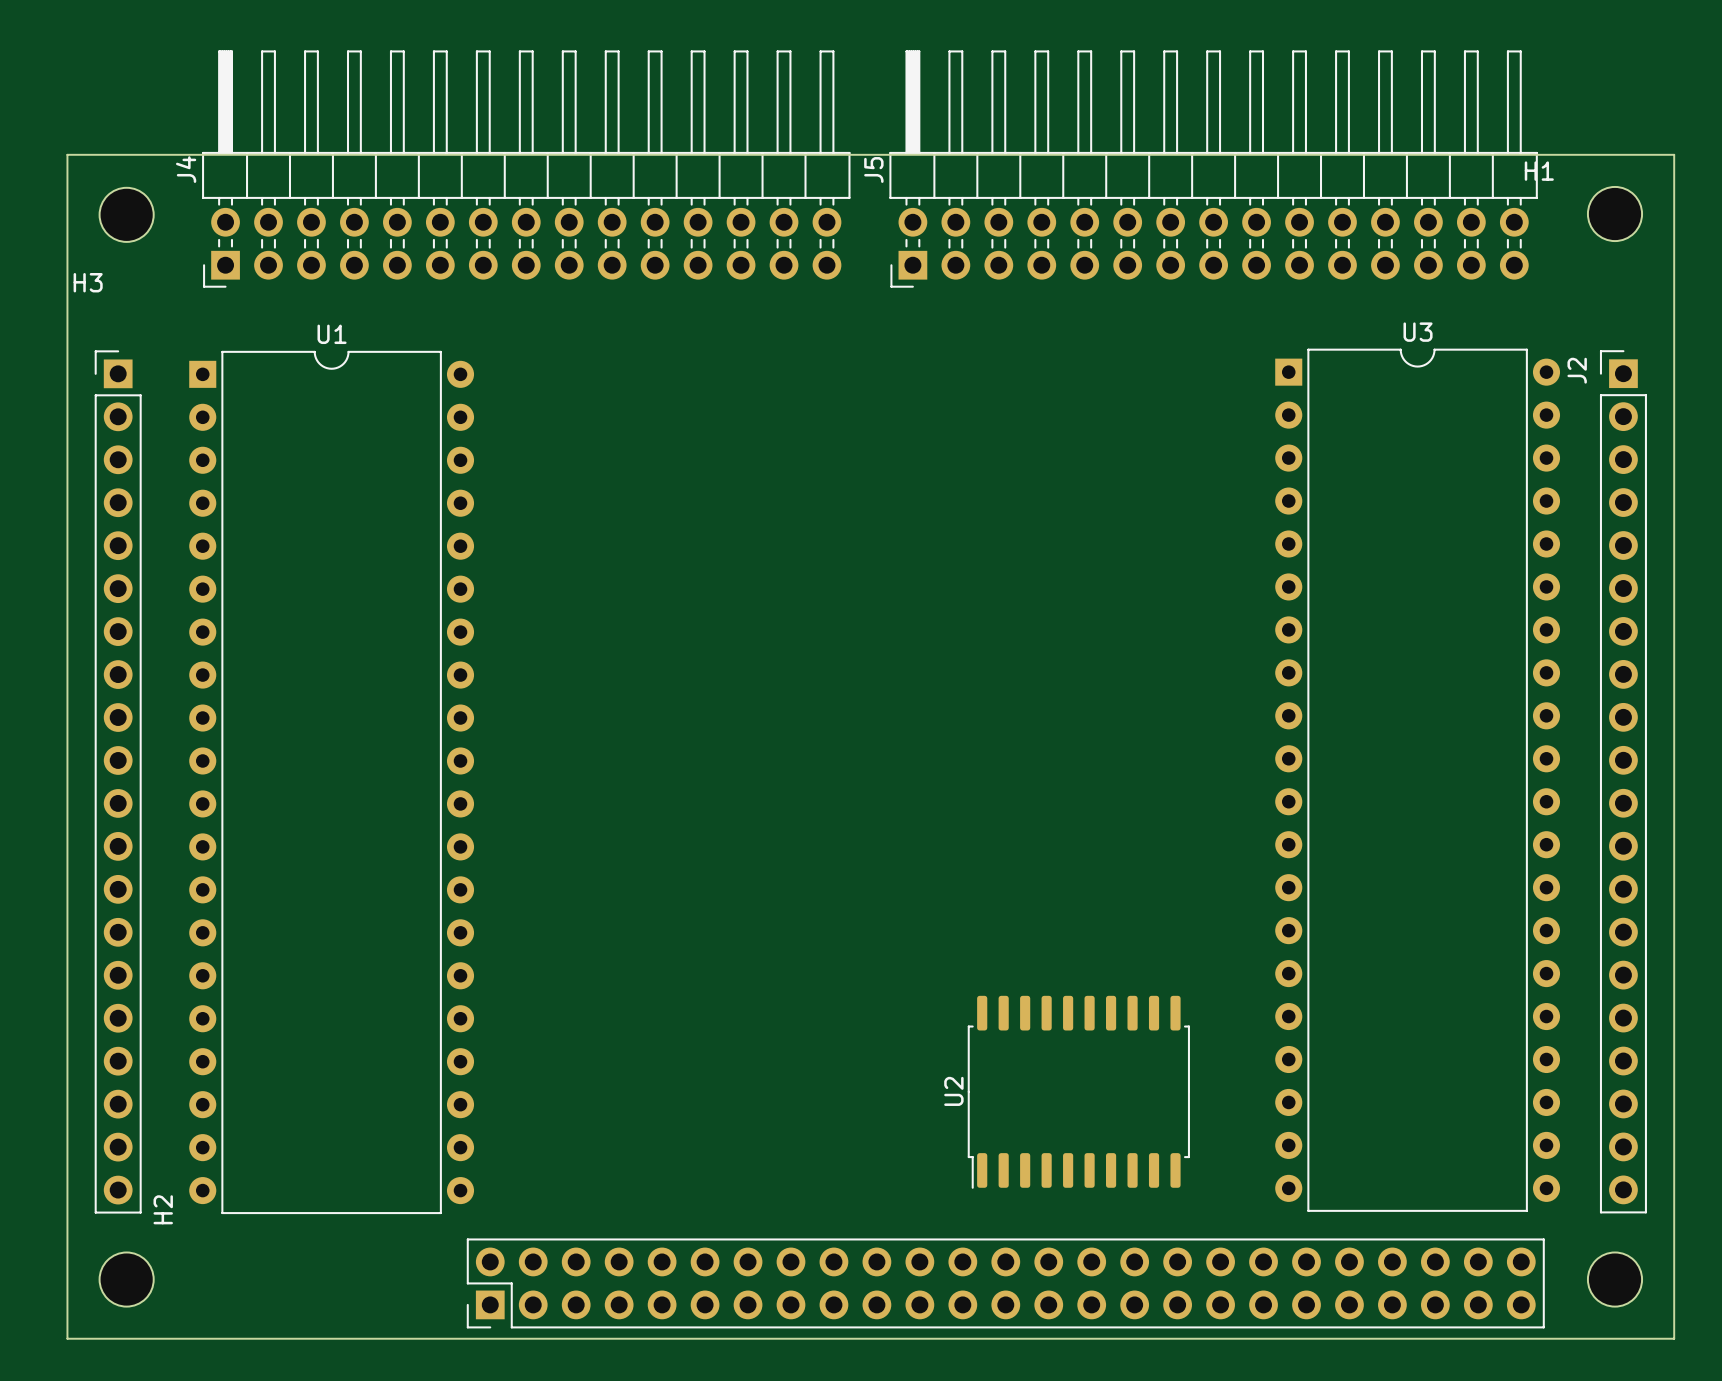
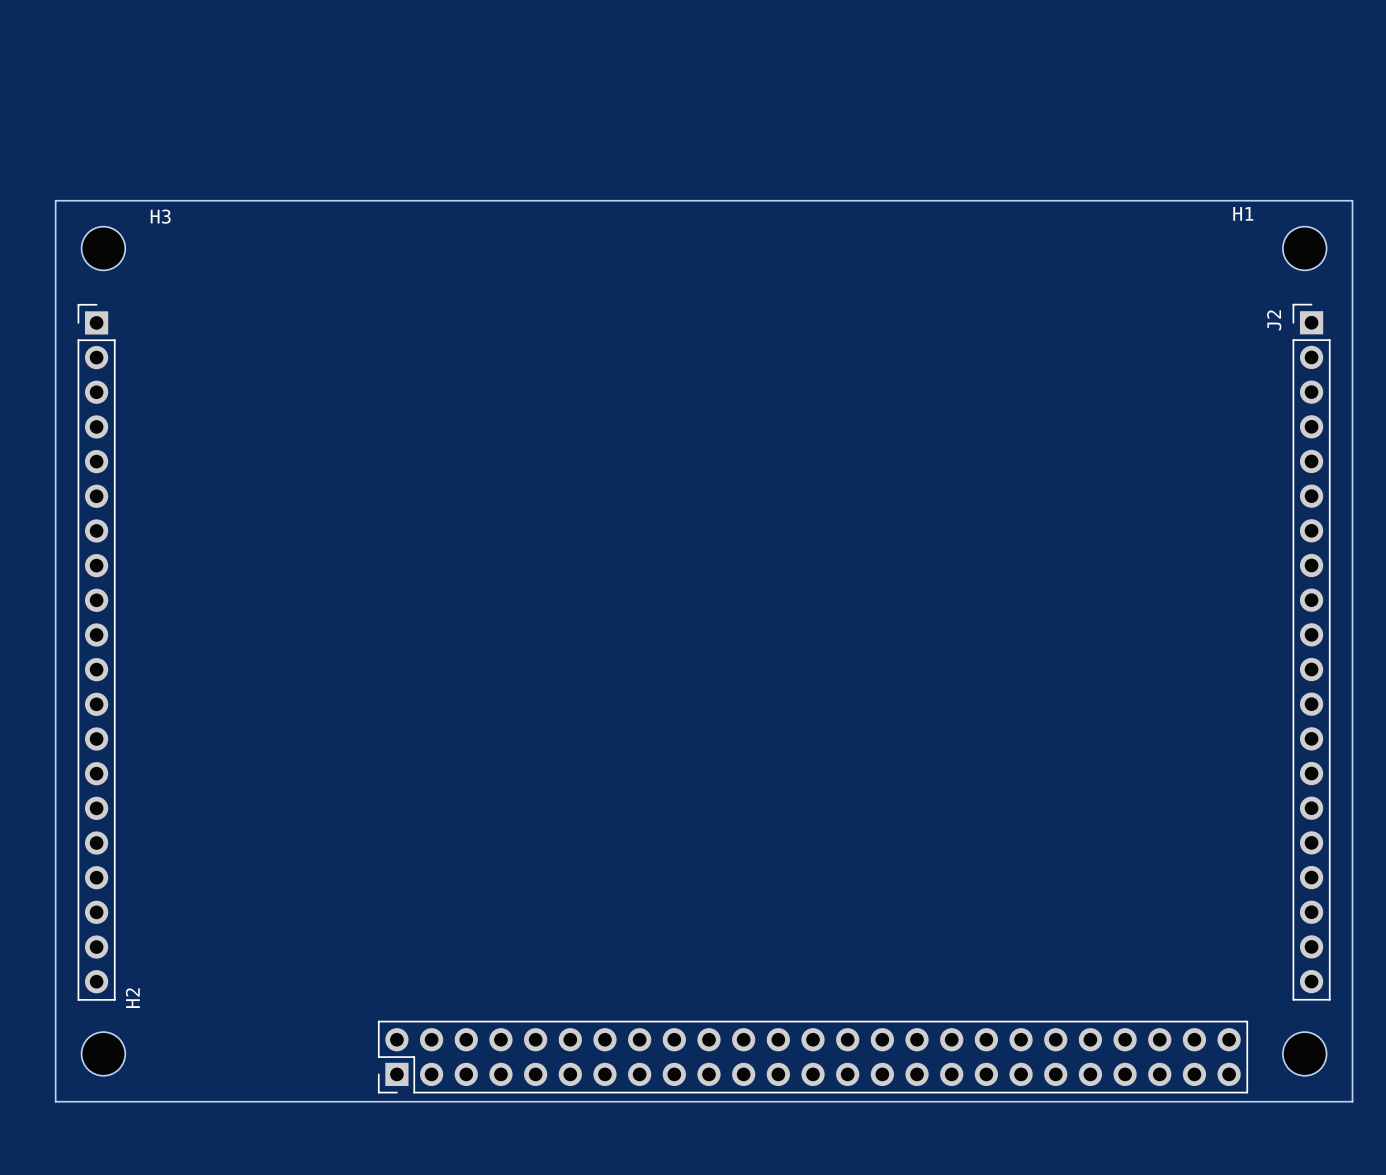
J4: (526, 169) -> none
J5: (1213, 169) -> none
H3 position: (126, 214) -> (103, 248)
H1 position: (1615, 214) -> (1304, 248)
board edge: (67, 222) (67, 154) (1674, 154) (1674, 222) -> (55, 200) (1352, 200)
H3 name position: H3 (88, 282) -> H3 (160, 216)
U3: (1417, 780) -> none
U1: (331, 782) -> none
U2: (1078, 1092) -> none

